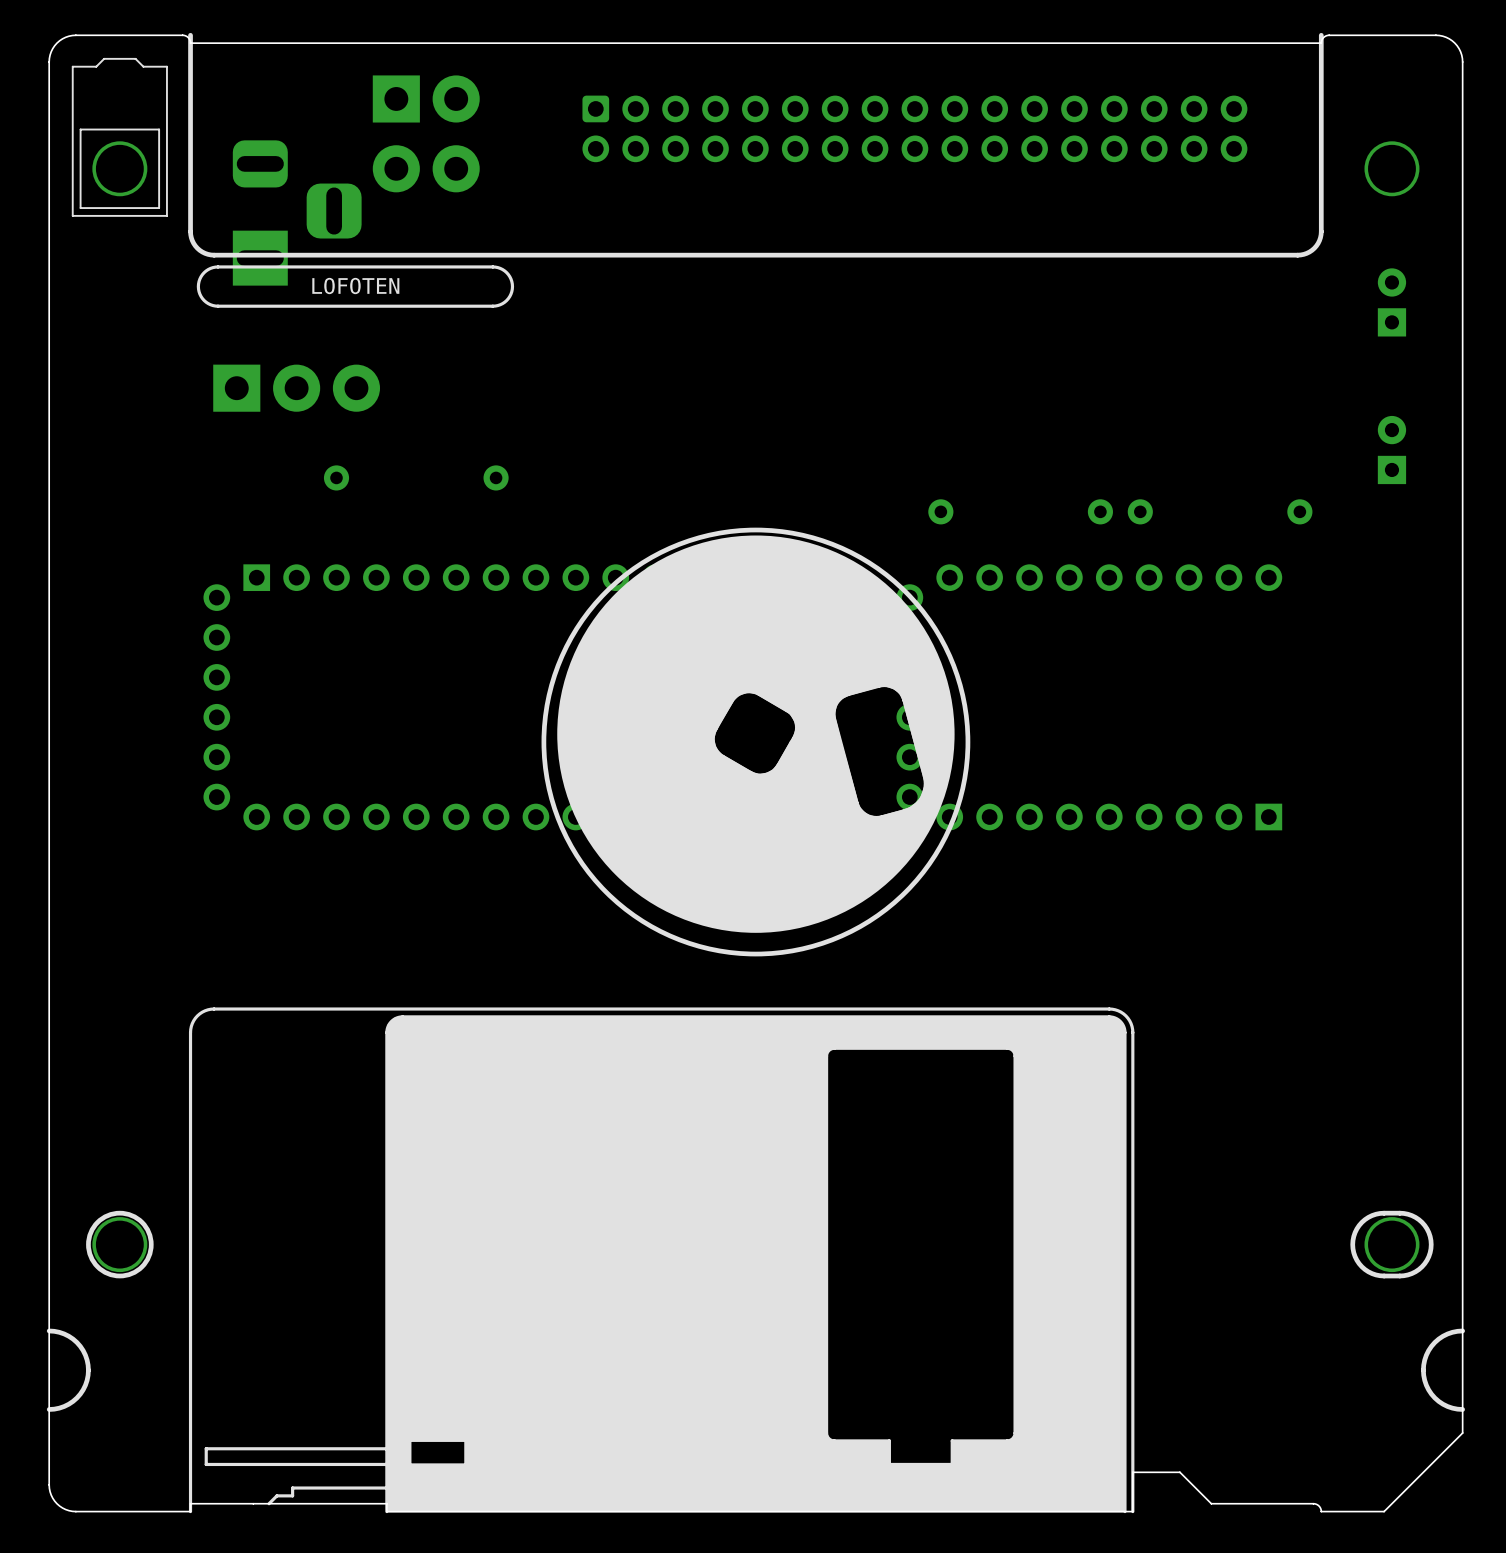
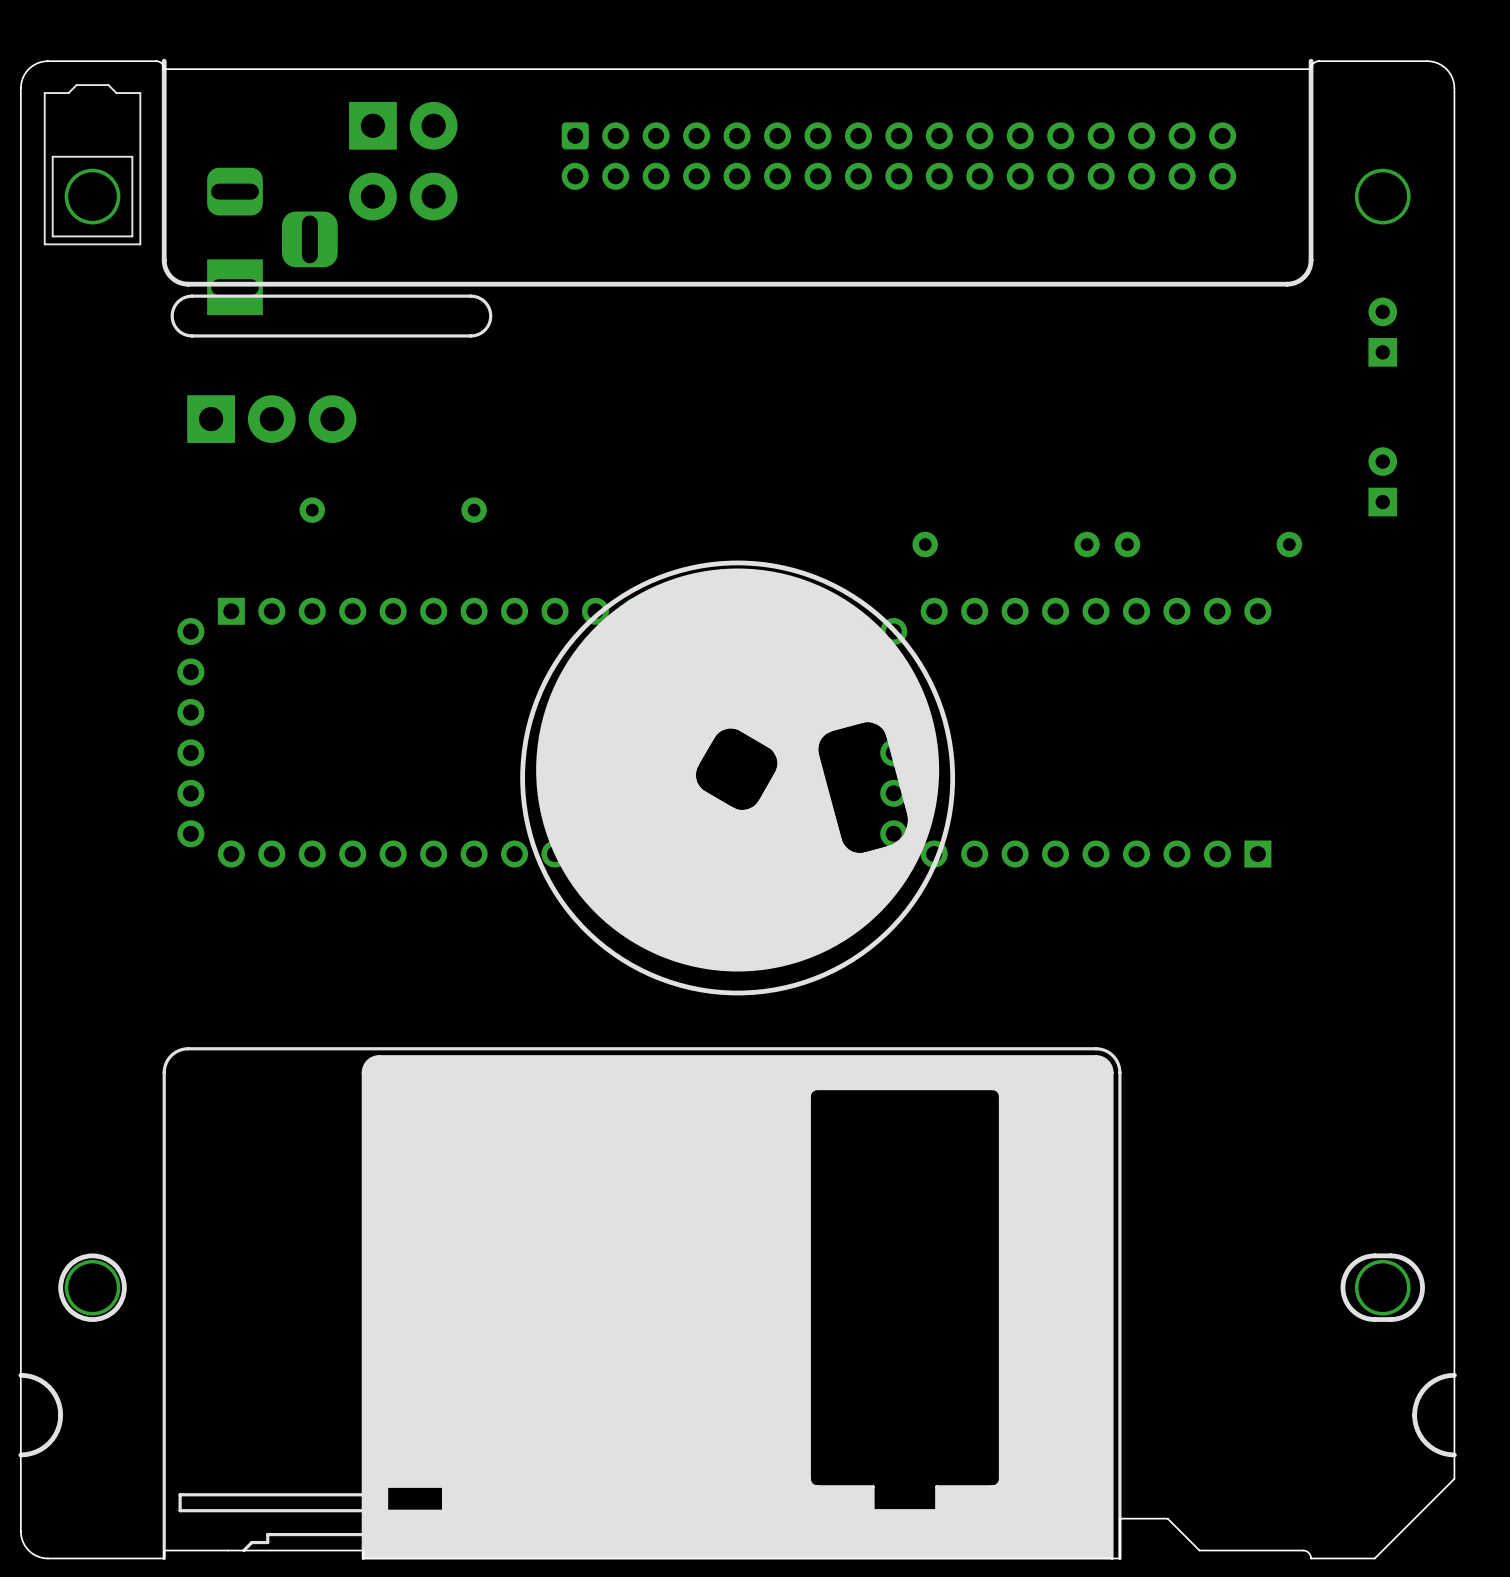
text: LOFOTEN (355, 286) -> none

